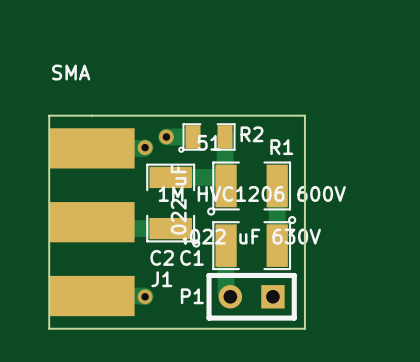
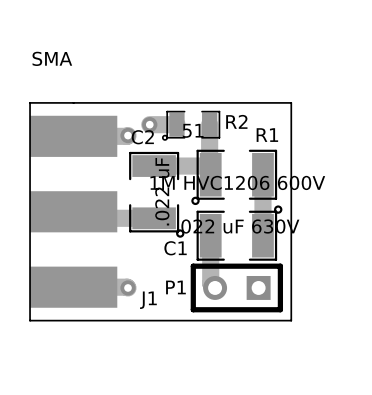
C2 name position: C2 (162, 257) -> C2 (142, 137)
J1 name position: J1 (161, 279) -> J1 (148, 300)

